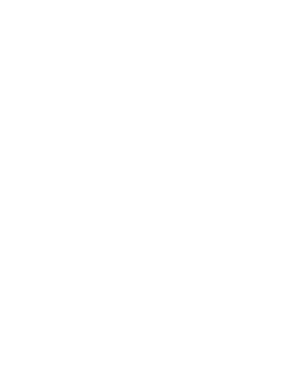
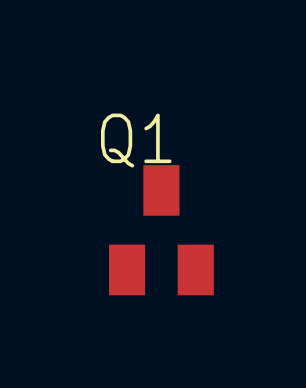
Q1: none -> (161, 230)

